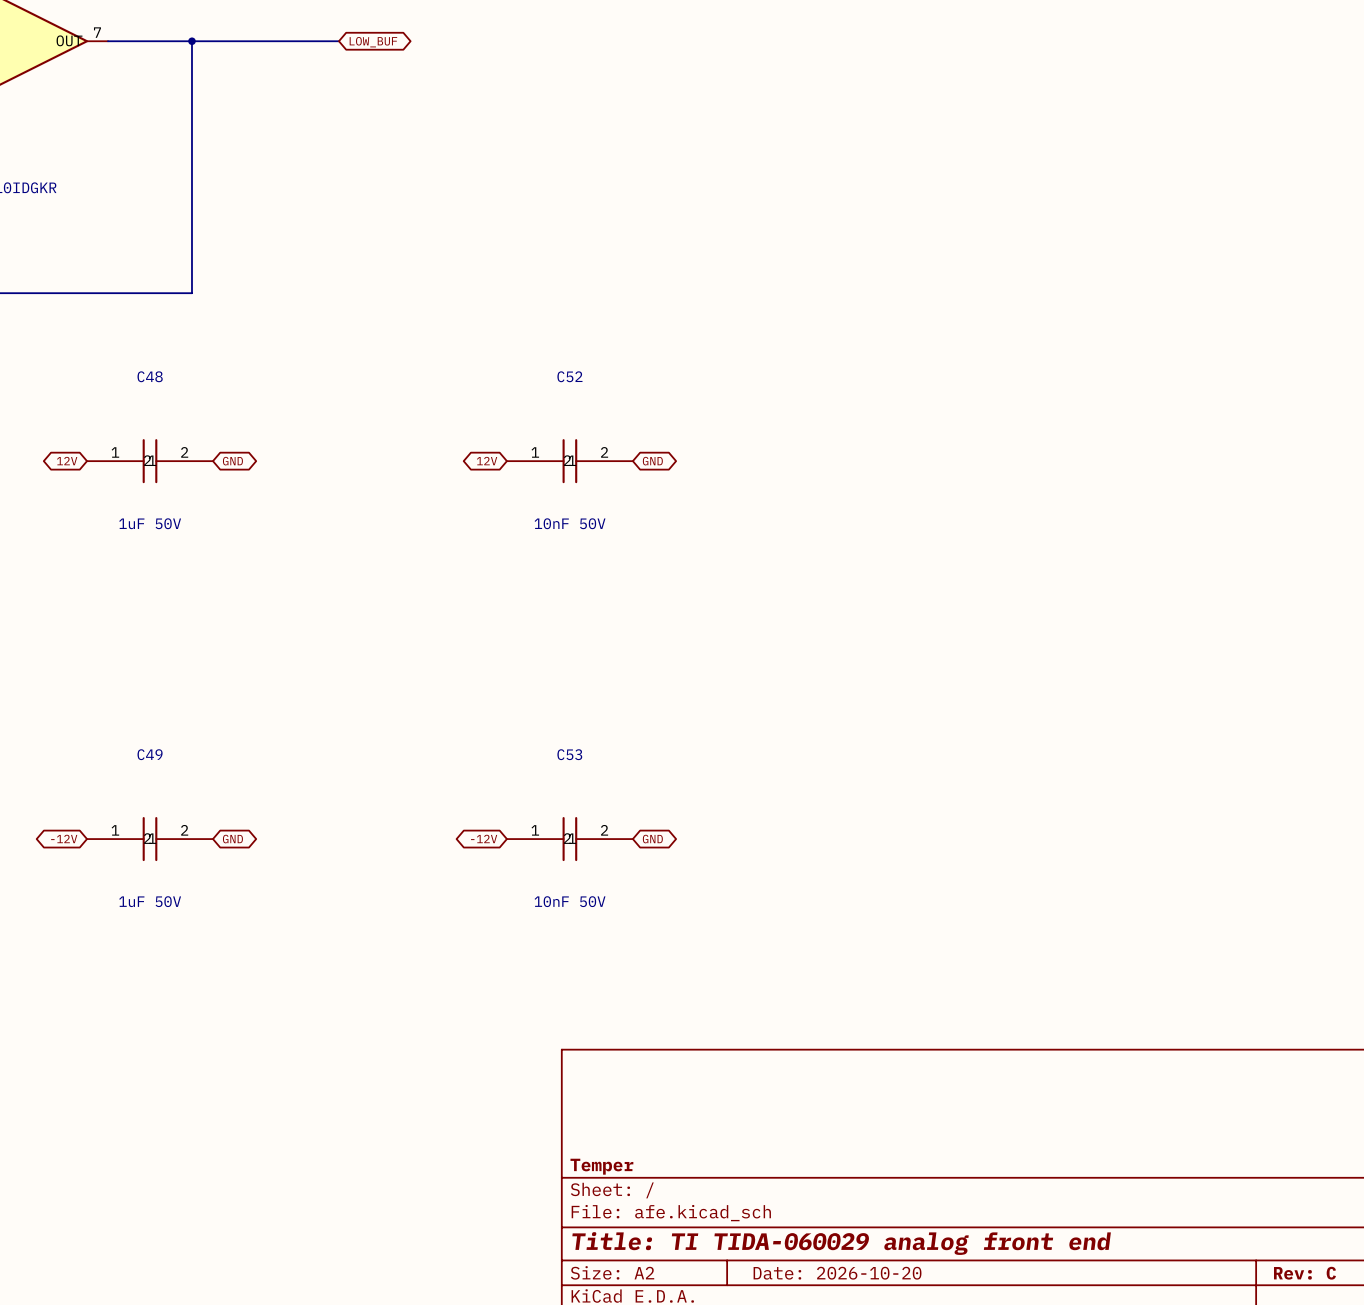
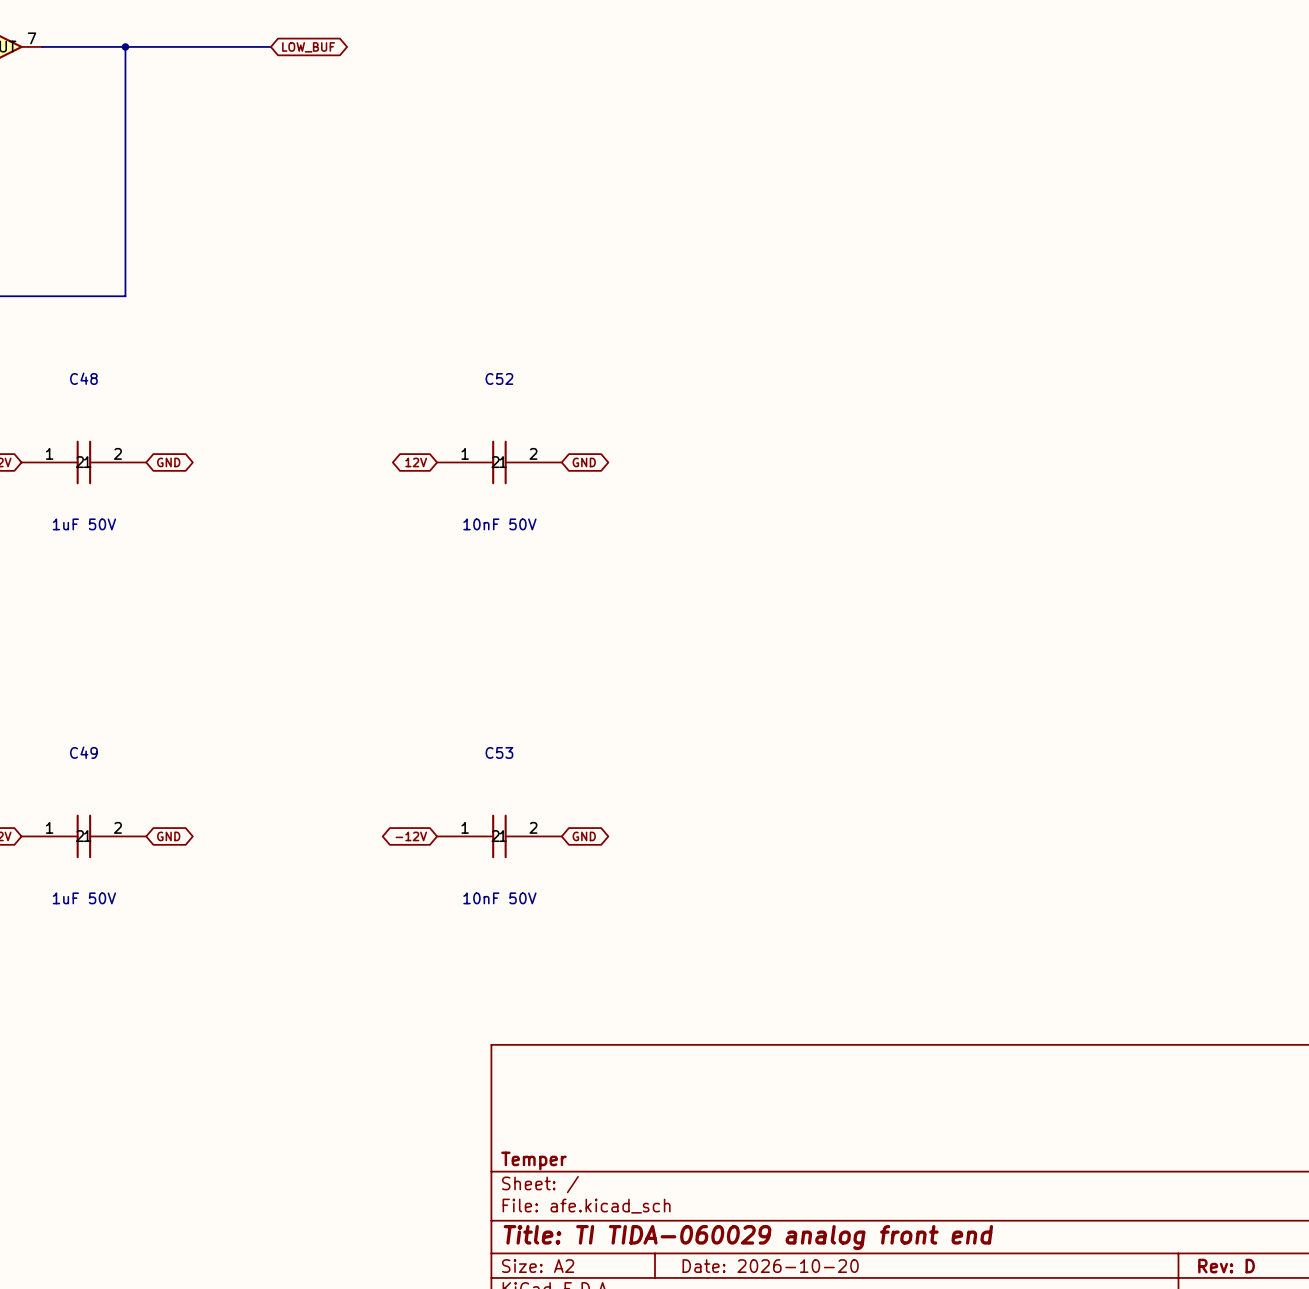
title block: Rev: C (1304, 1273) -> Rev: D (1226, 1266)

